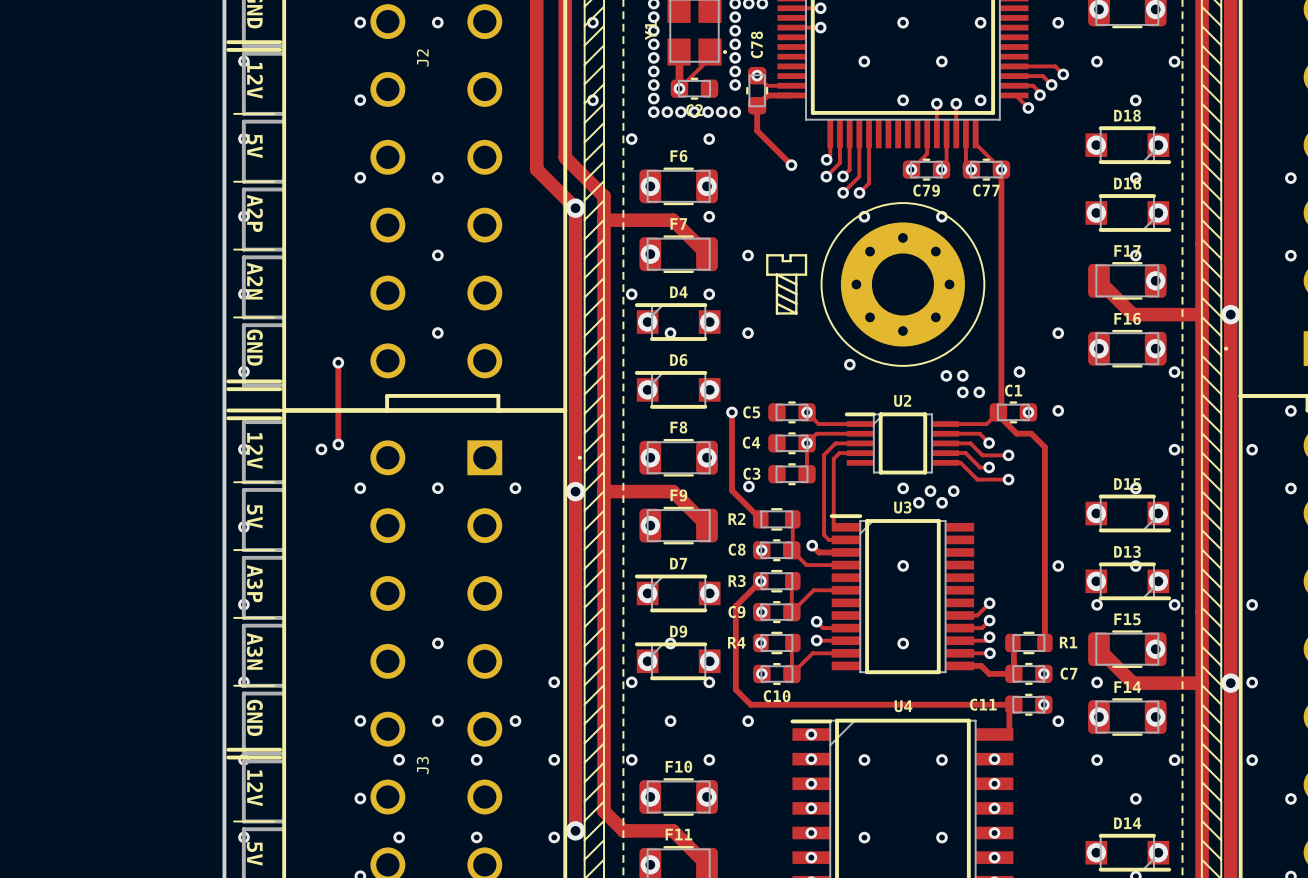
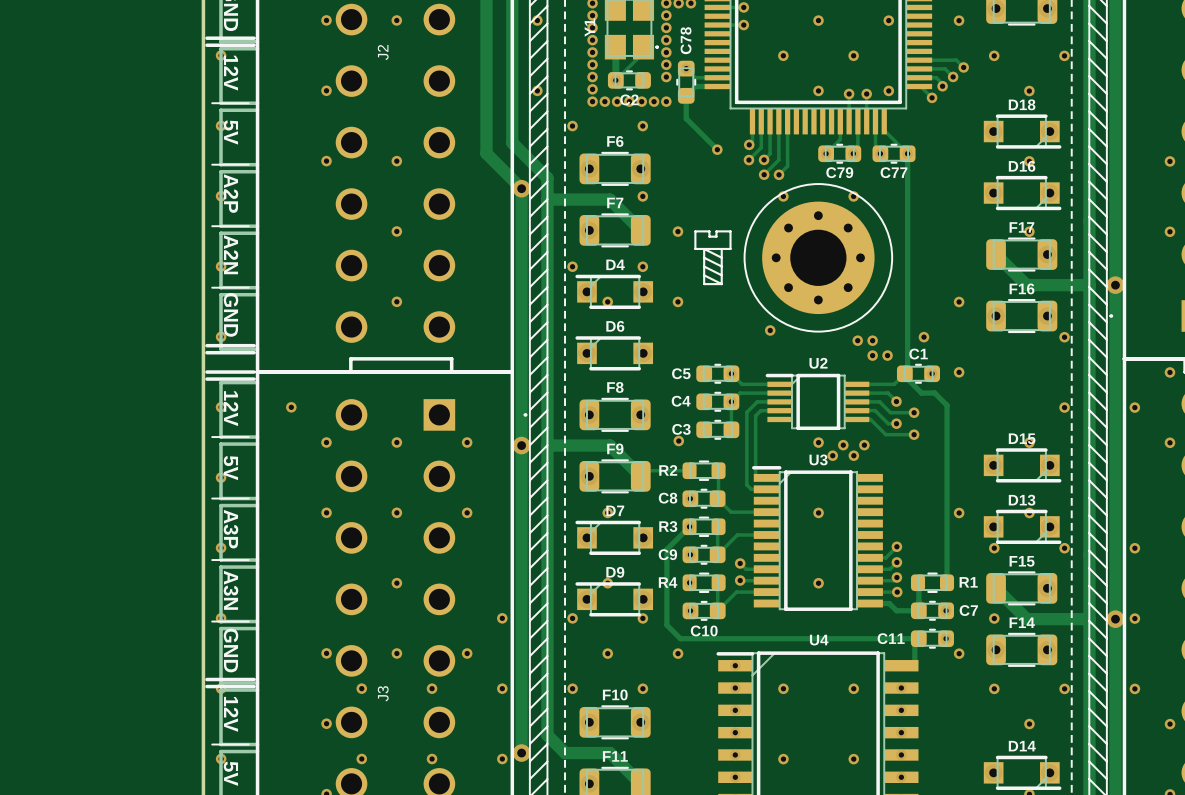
track: (338, 362) (338, 444) -> none
via: (338, 362) -> none
track: (731, 412) (731, 490) (760, 519) -> (646, 470) (689, 470)
via: (731, 412) -> none
via: (338, 444) -> none
track: (812, 545) (819, 552) (845, 551) -> none
via: (812, 545) -> none
via: none -> (326, 512)
via: none -> (396, 512)
via: none -> (467, 512)
via: none -> (607, 512)

